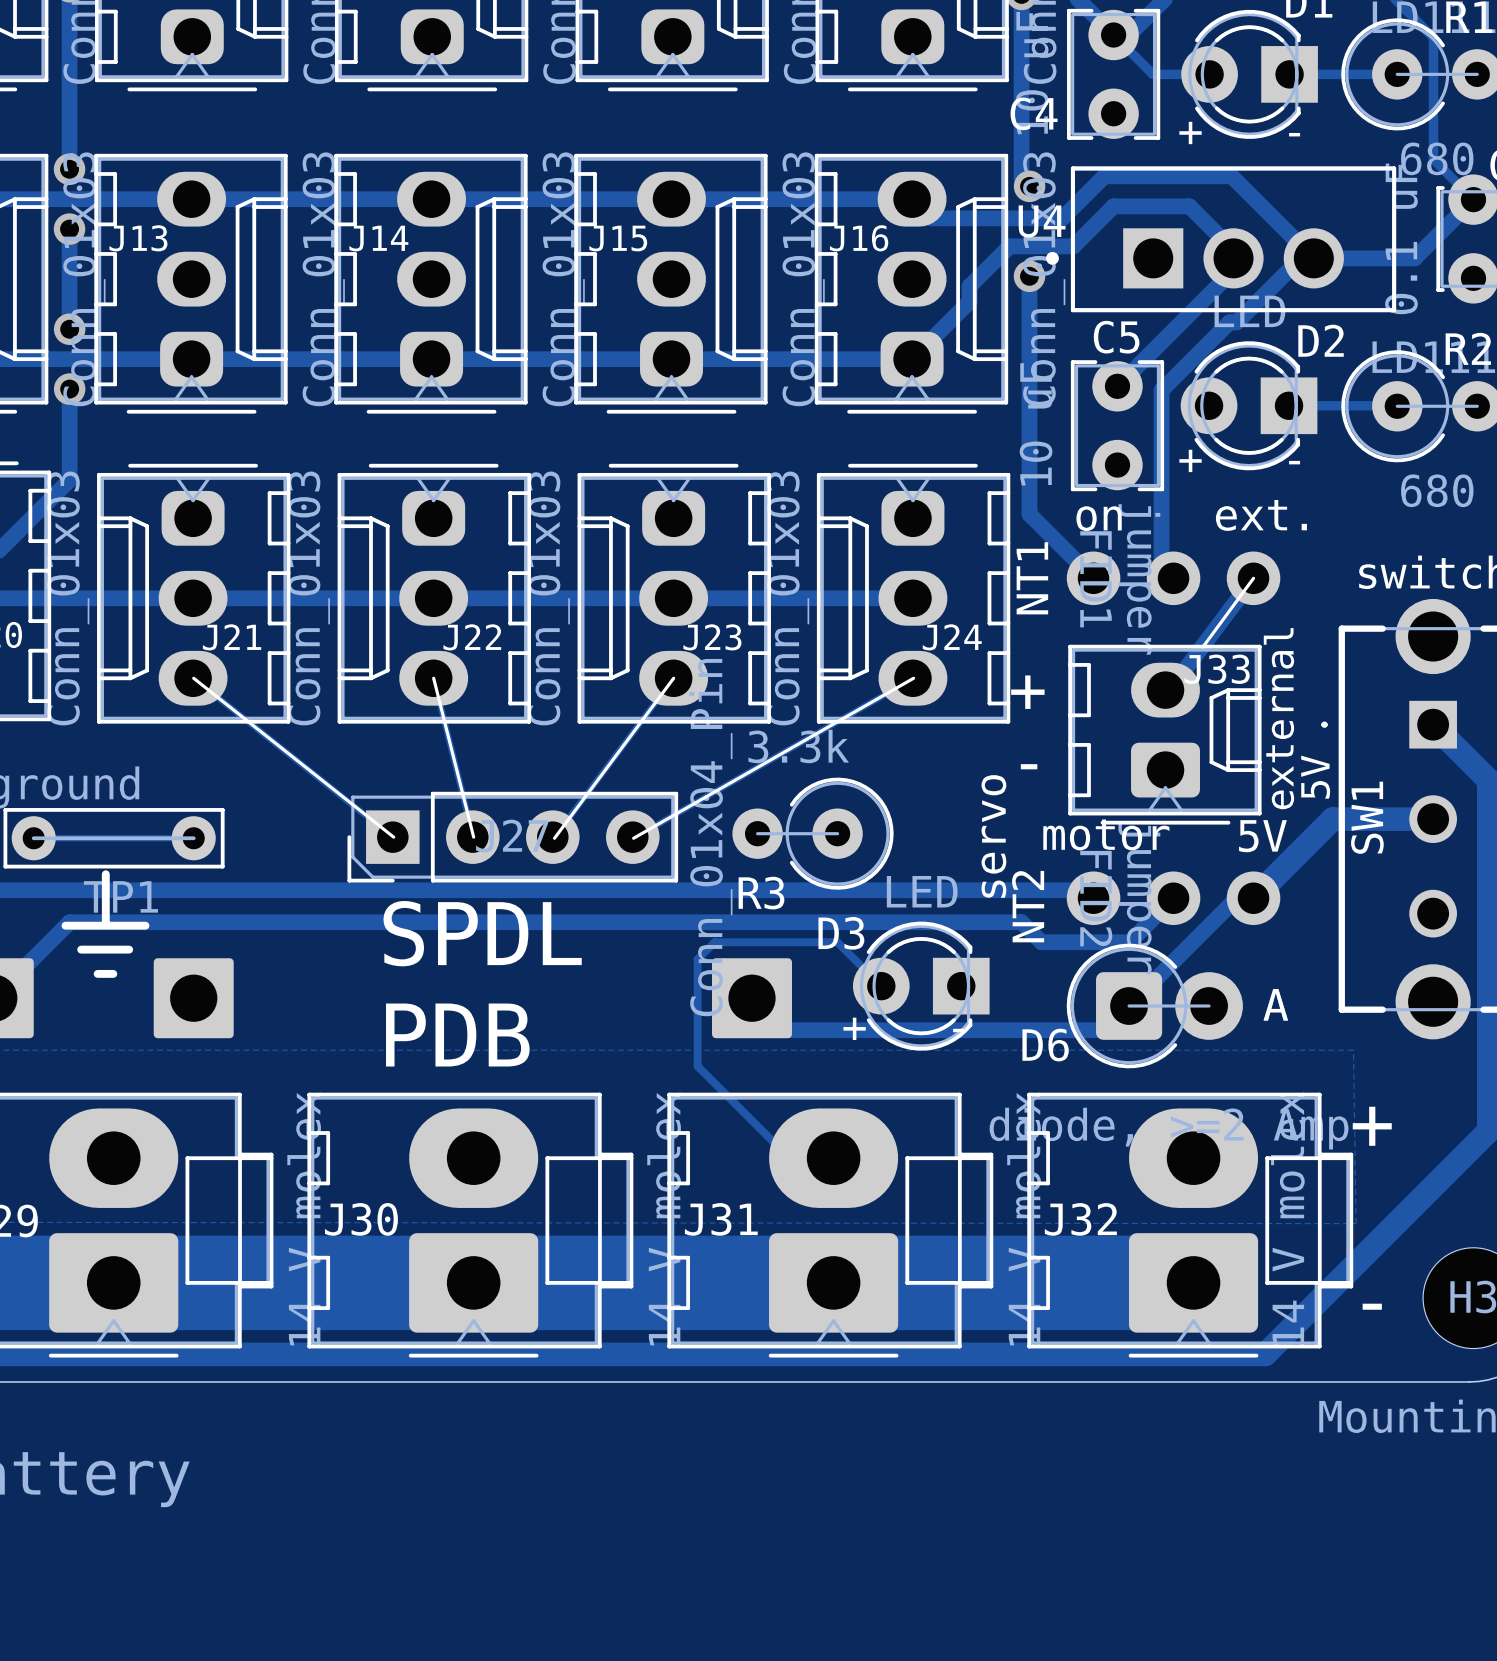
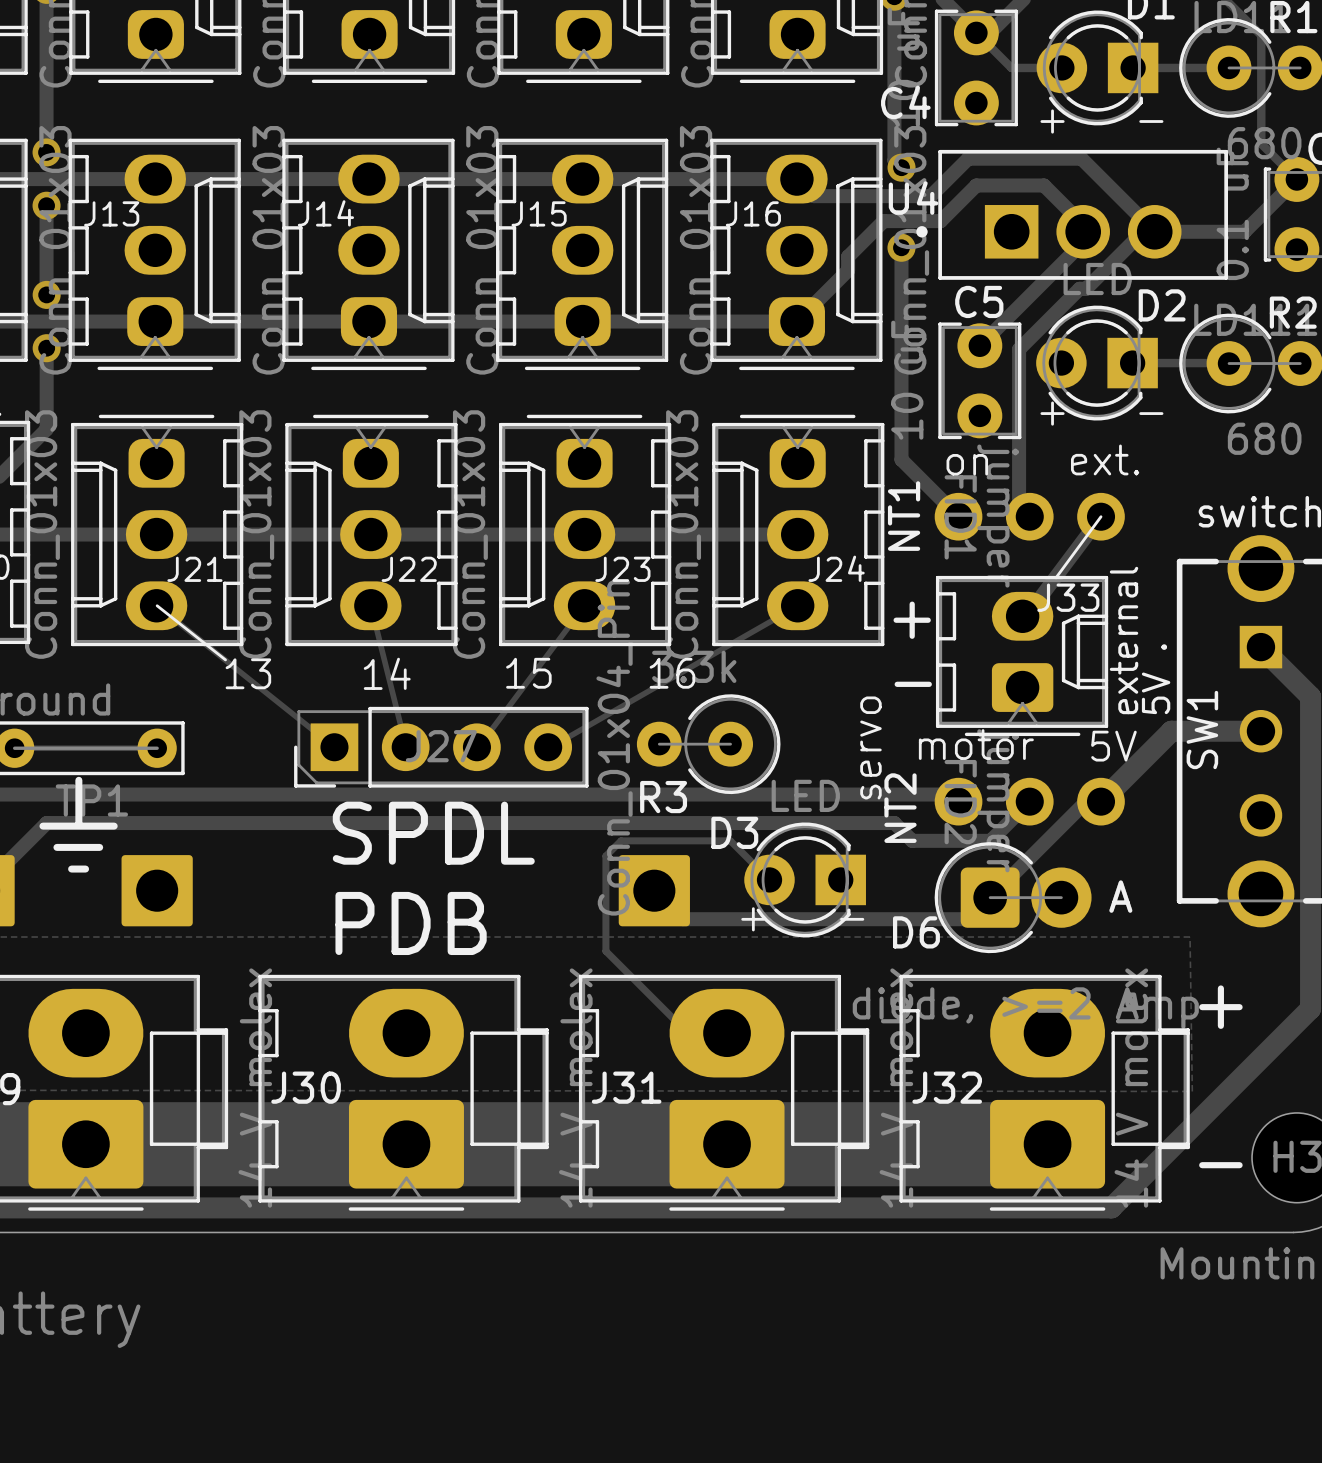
line: (193, 678) (393, 837) -> (157, 605) (225, 659)
line: (433, 678) (473, 837) -> none
line: (673, 678) (554, 838) -> none
line: (913, 678) (633, 838) -> none
text: none -> 13 (248, 673)
text: none -> 15 (528, 673)
text: none -> 16 (672, 673)
text: none -> 14 (387, 673)

